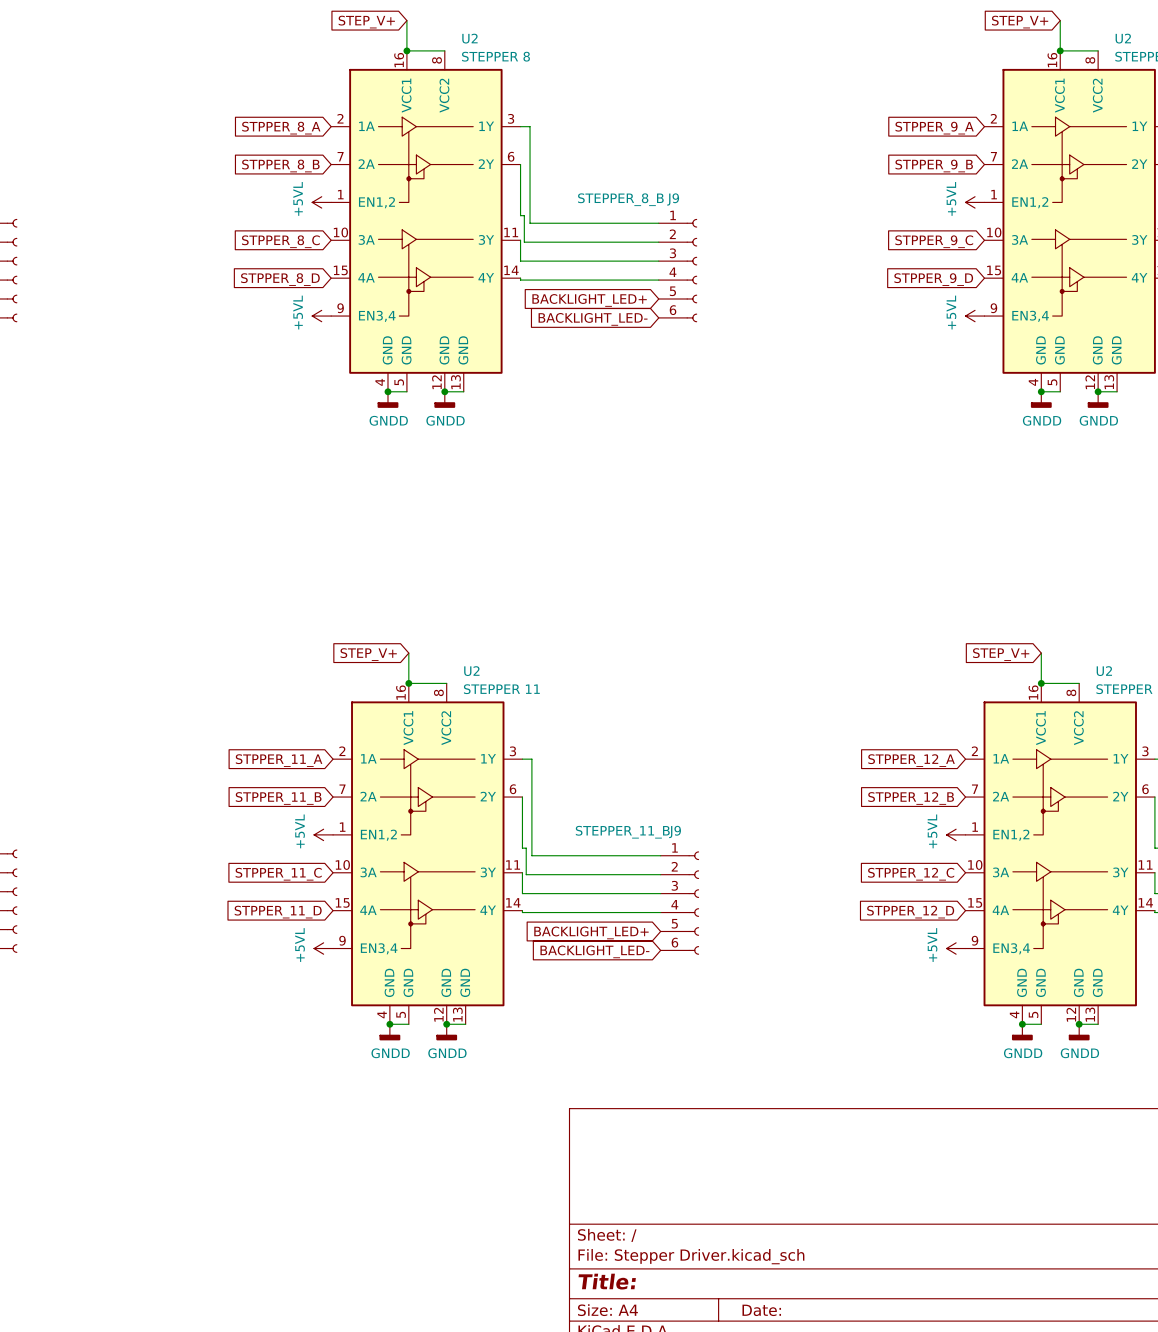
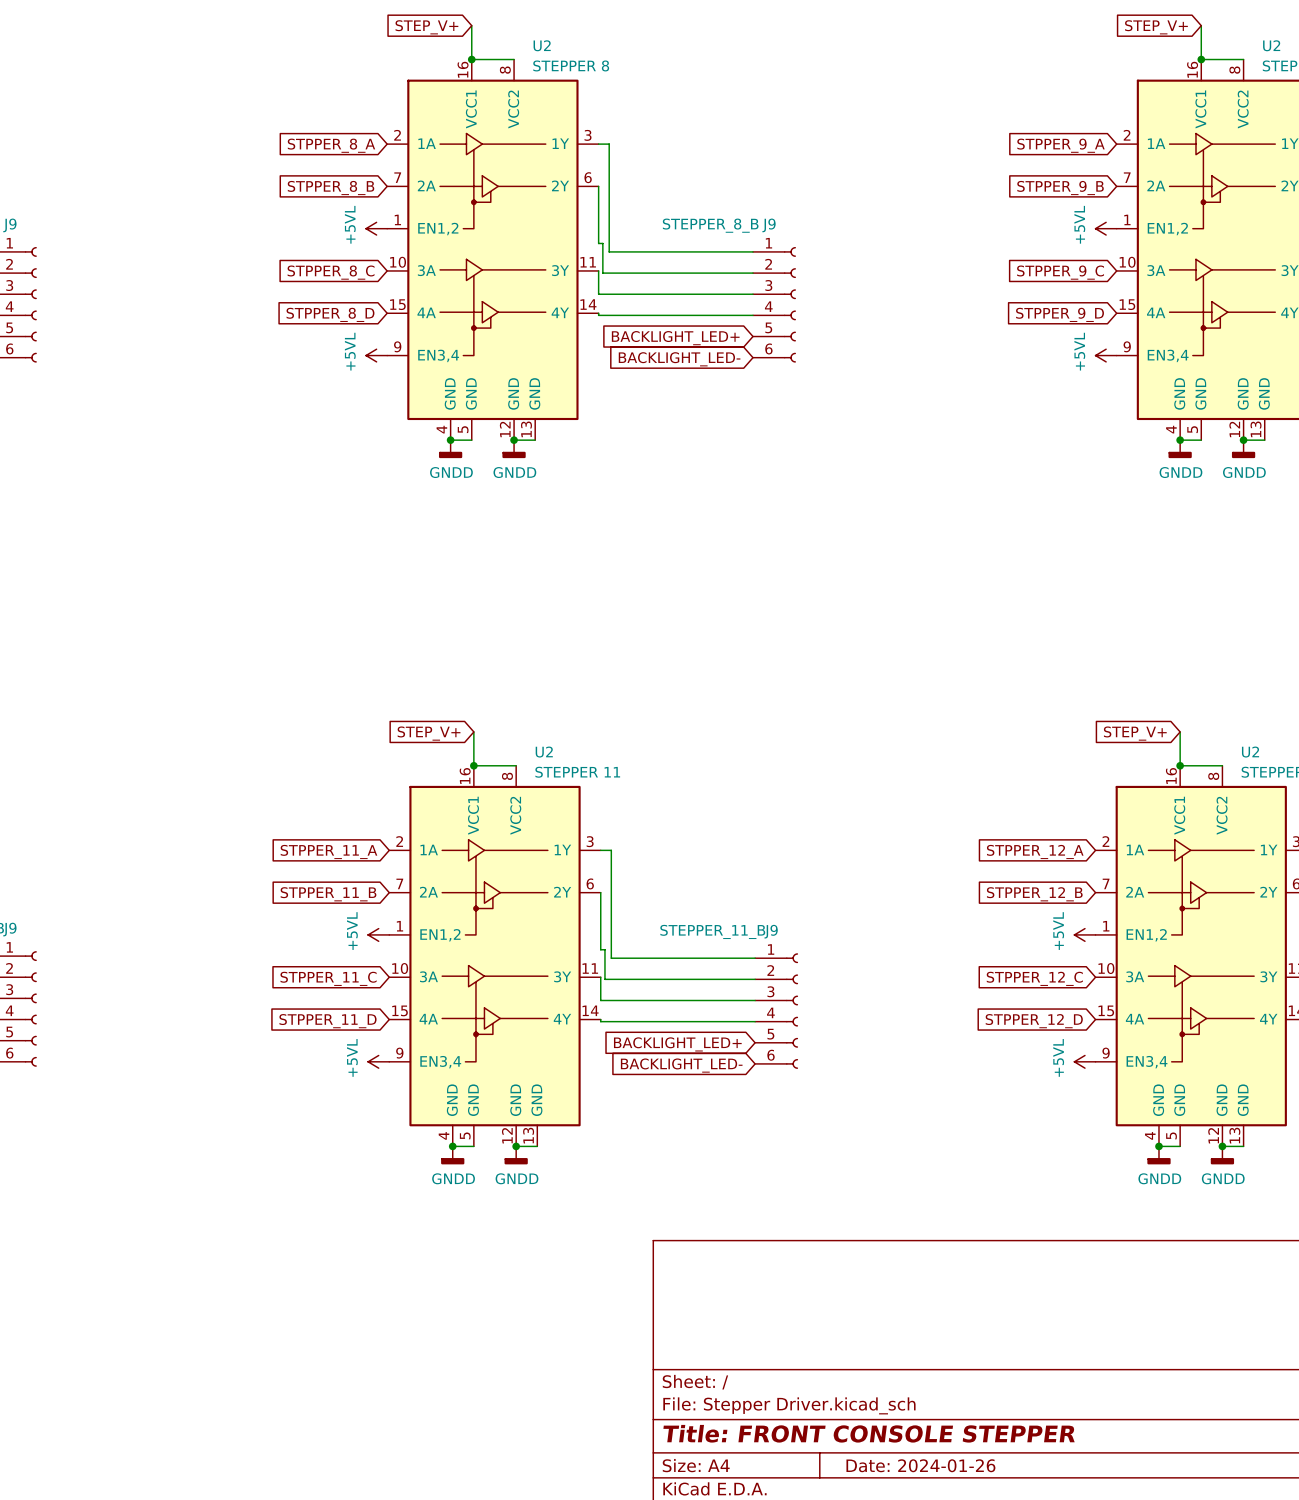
title block: Title: (607, 1281) -> Title: FRONT CONSOLE STEPPER (869, 1433)
title block: Date: (761, 1310) -> Date: 2024-01-26 (920, 1465)

